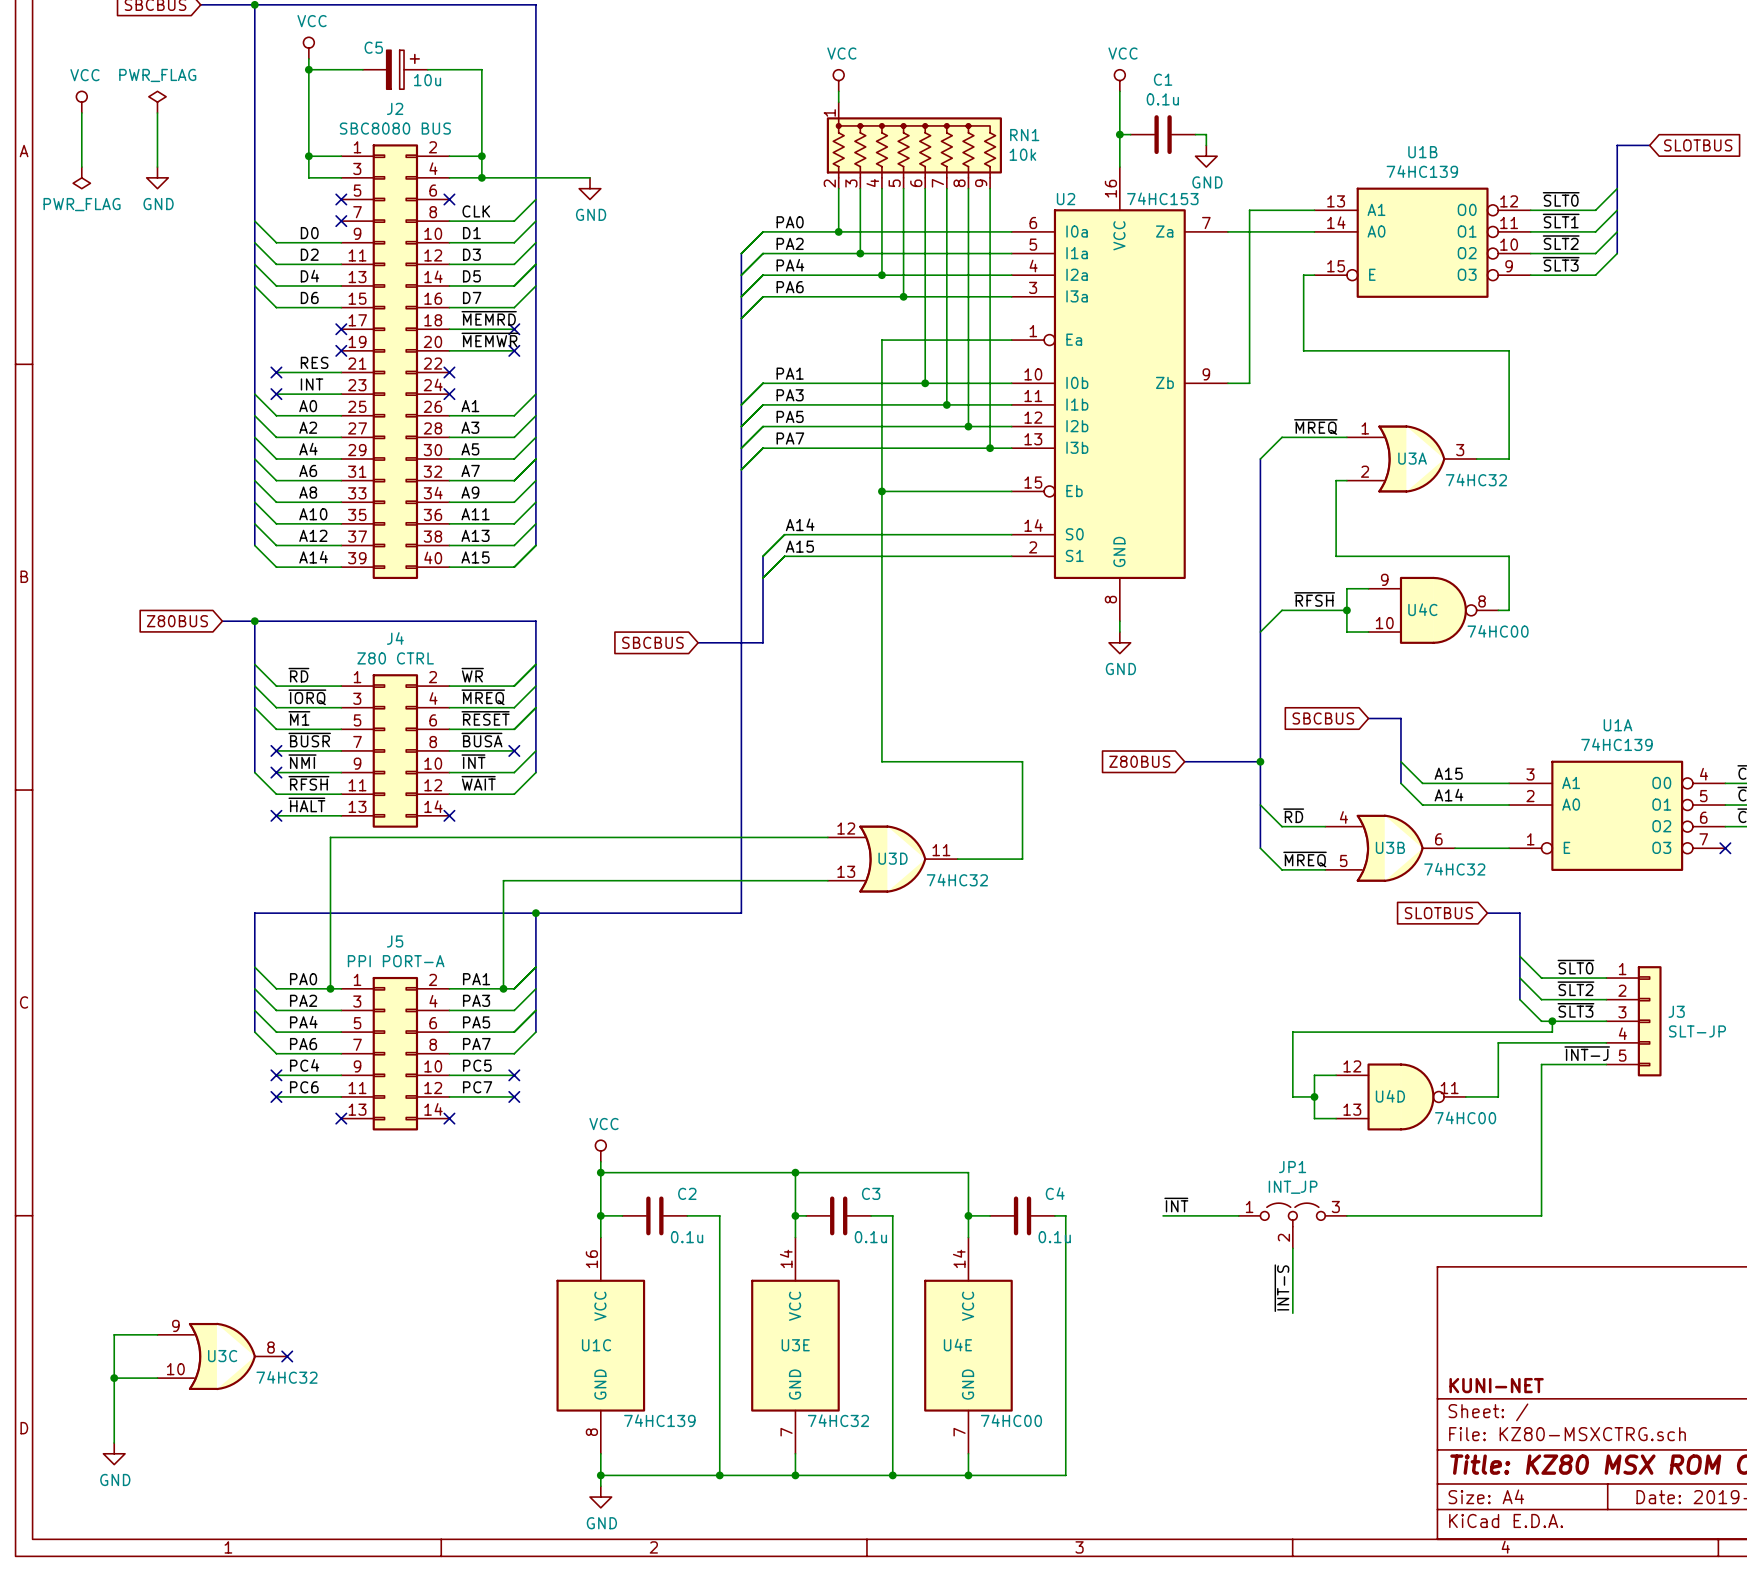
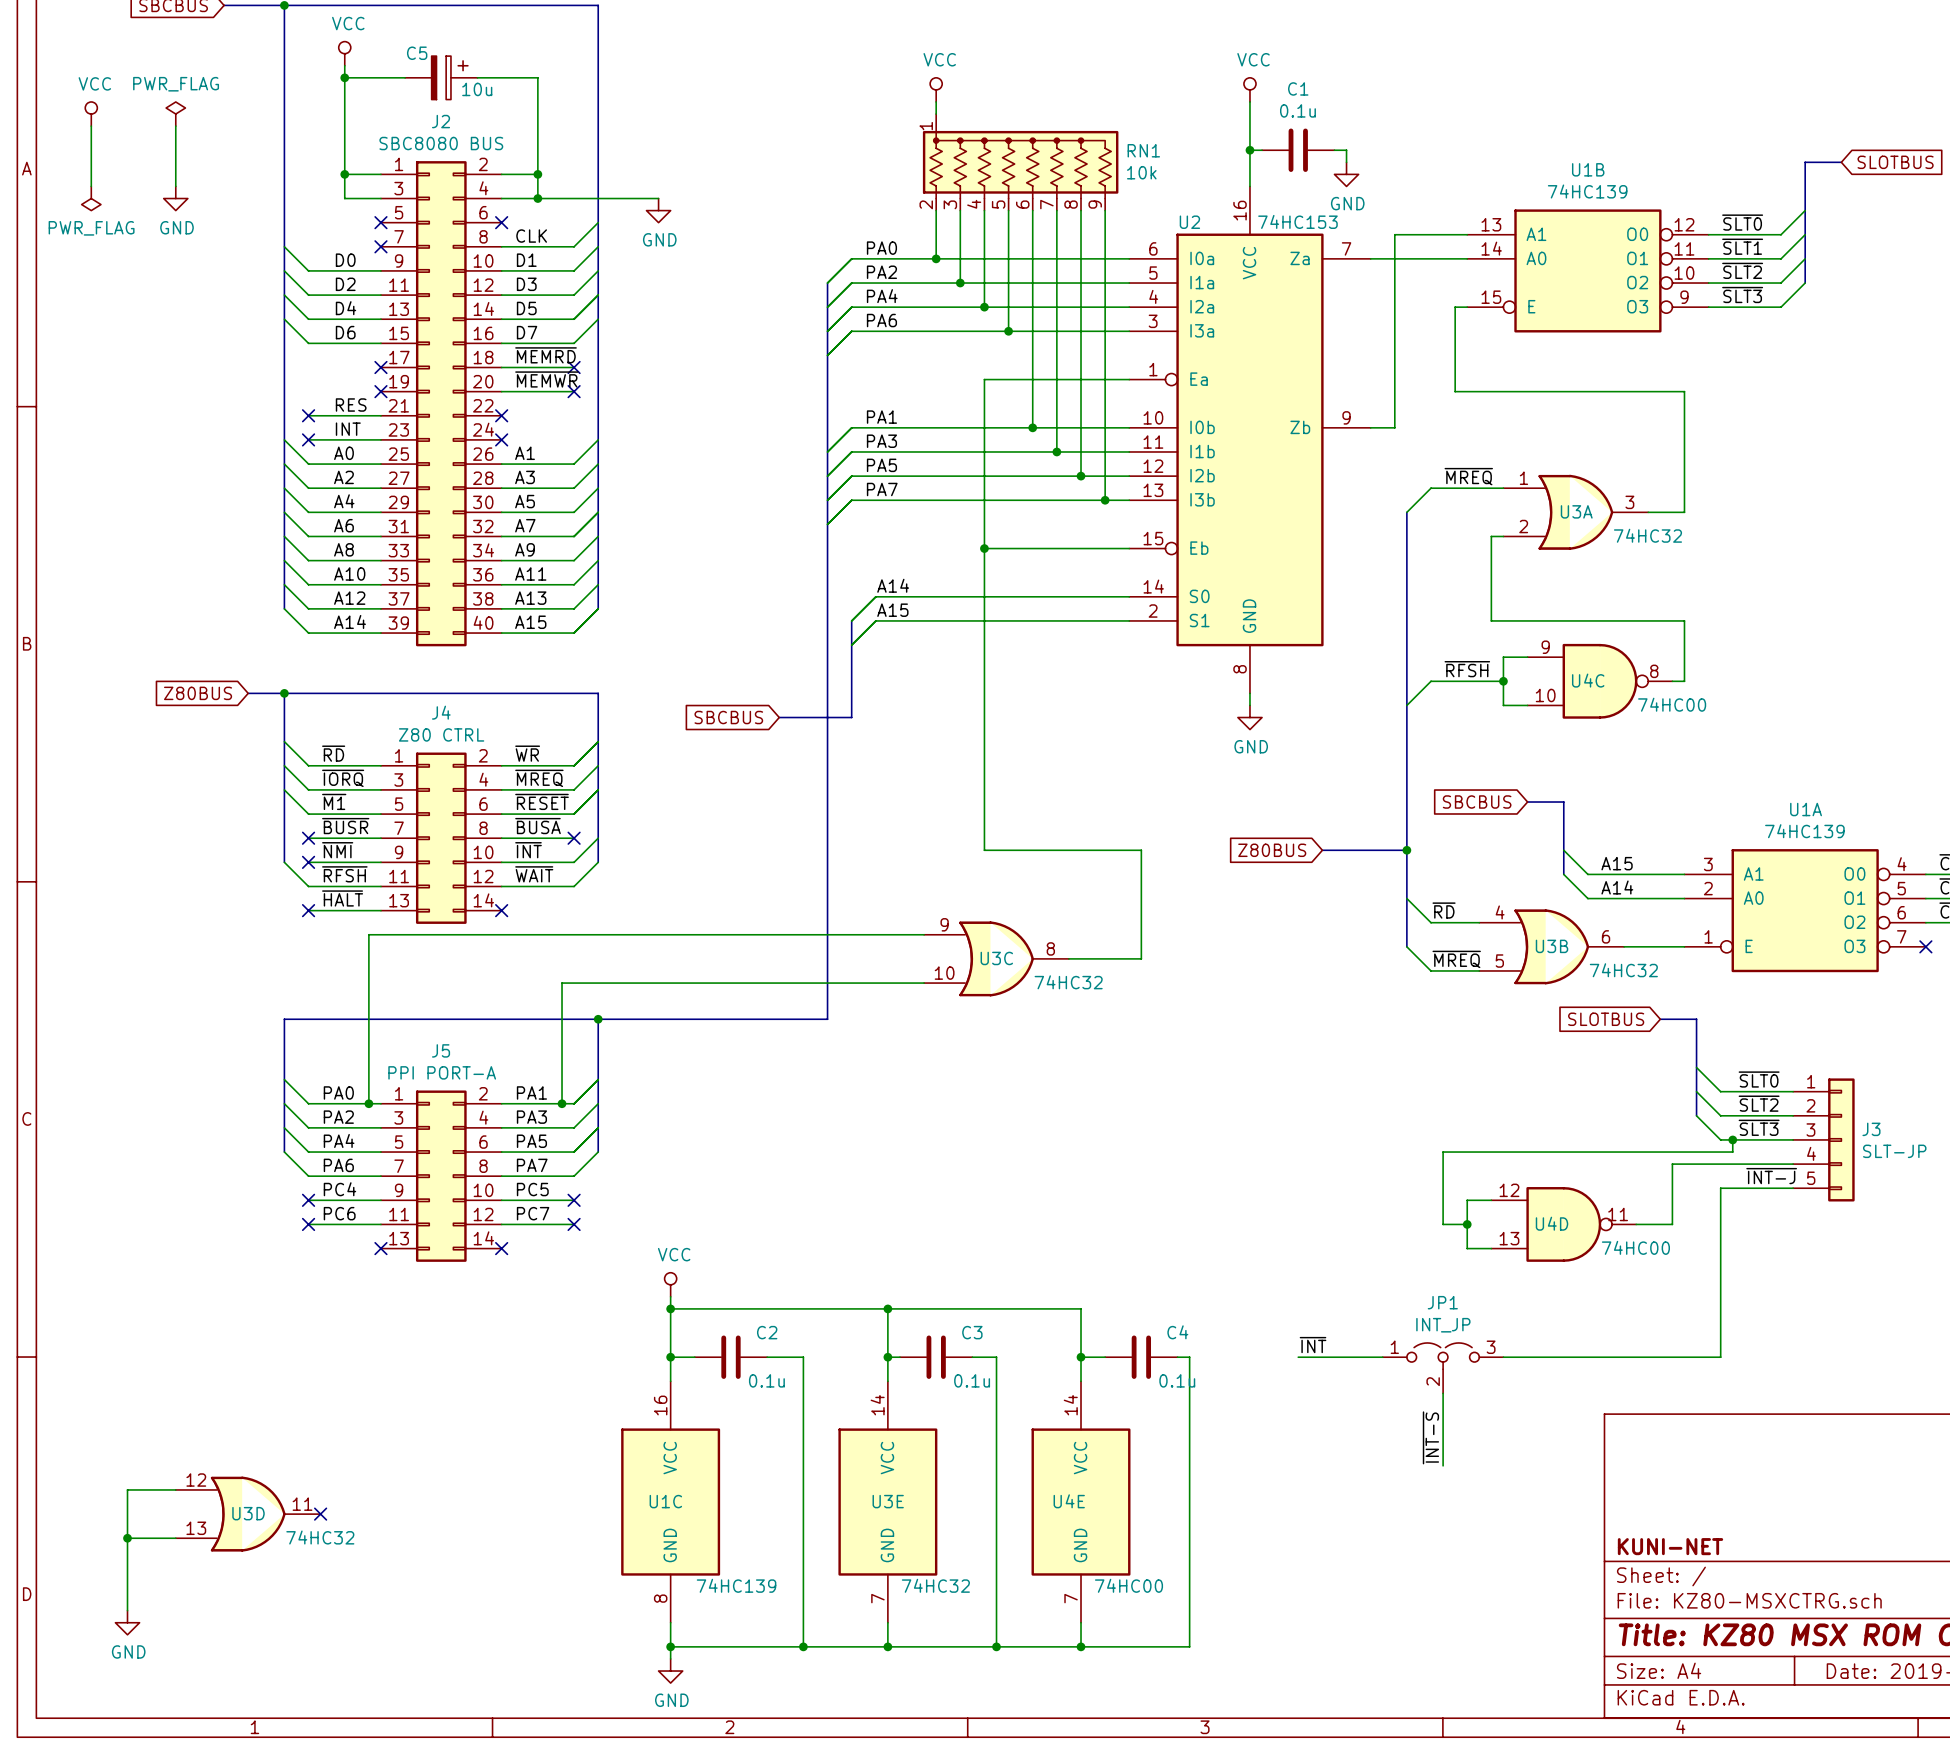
U3D position: (892, 859) -> (248, 1514)
U3C position: (222, 1356) -> (996, 958)

